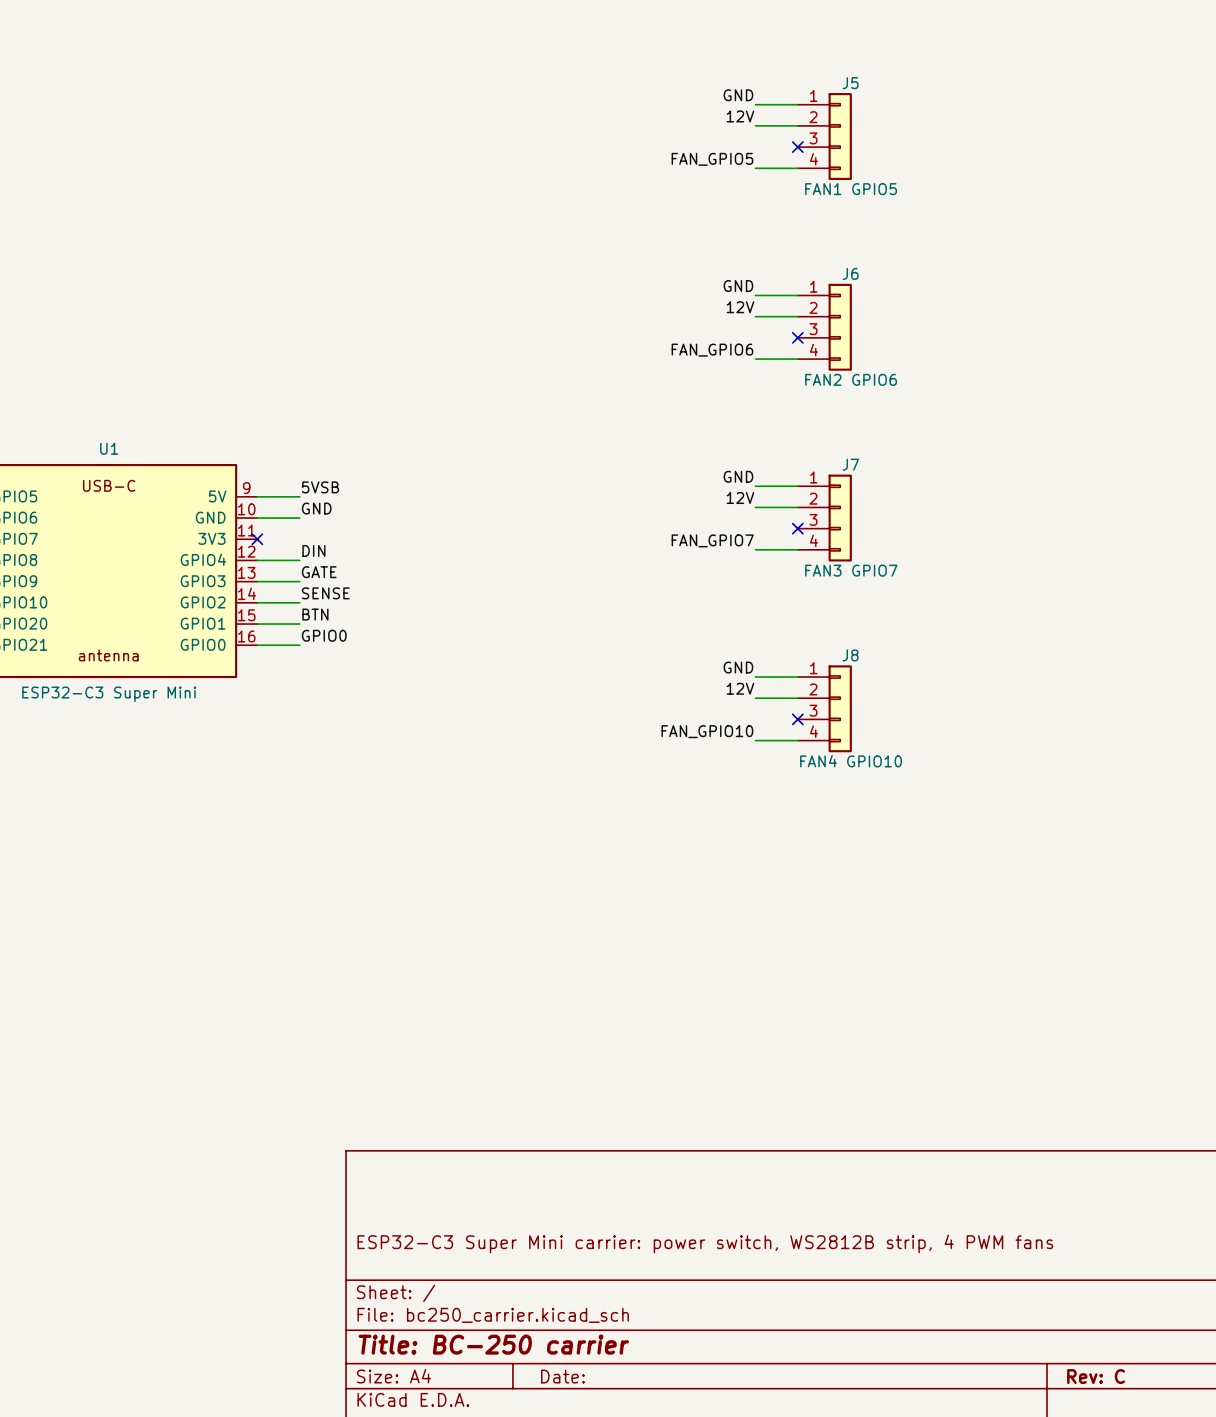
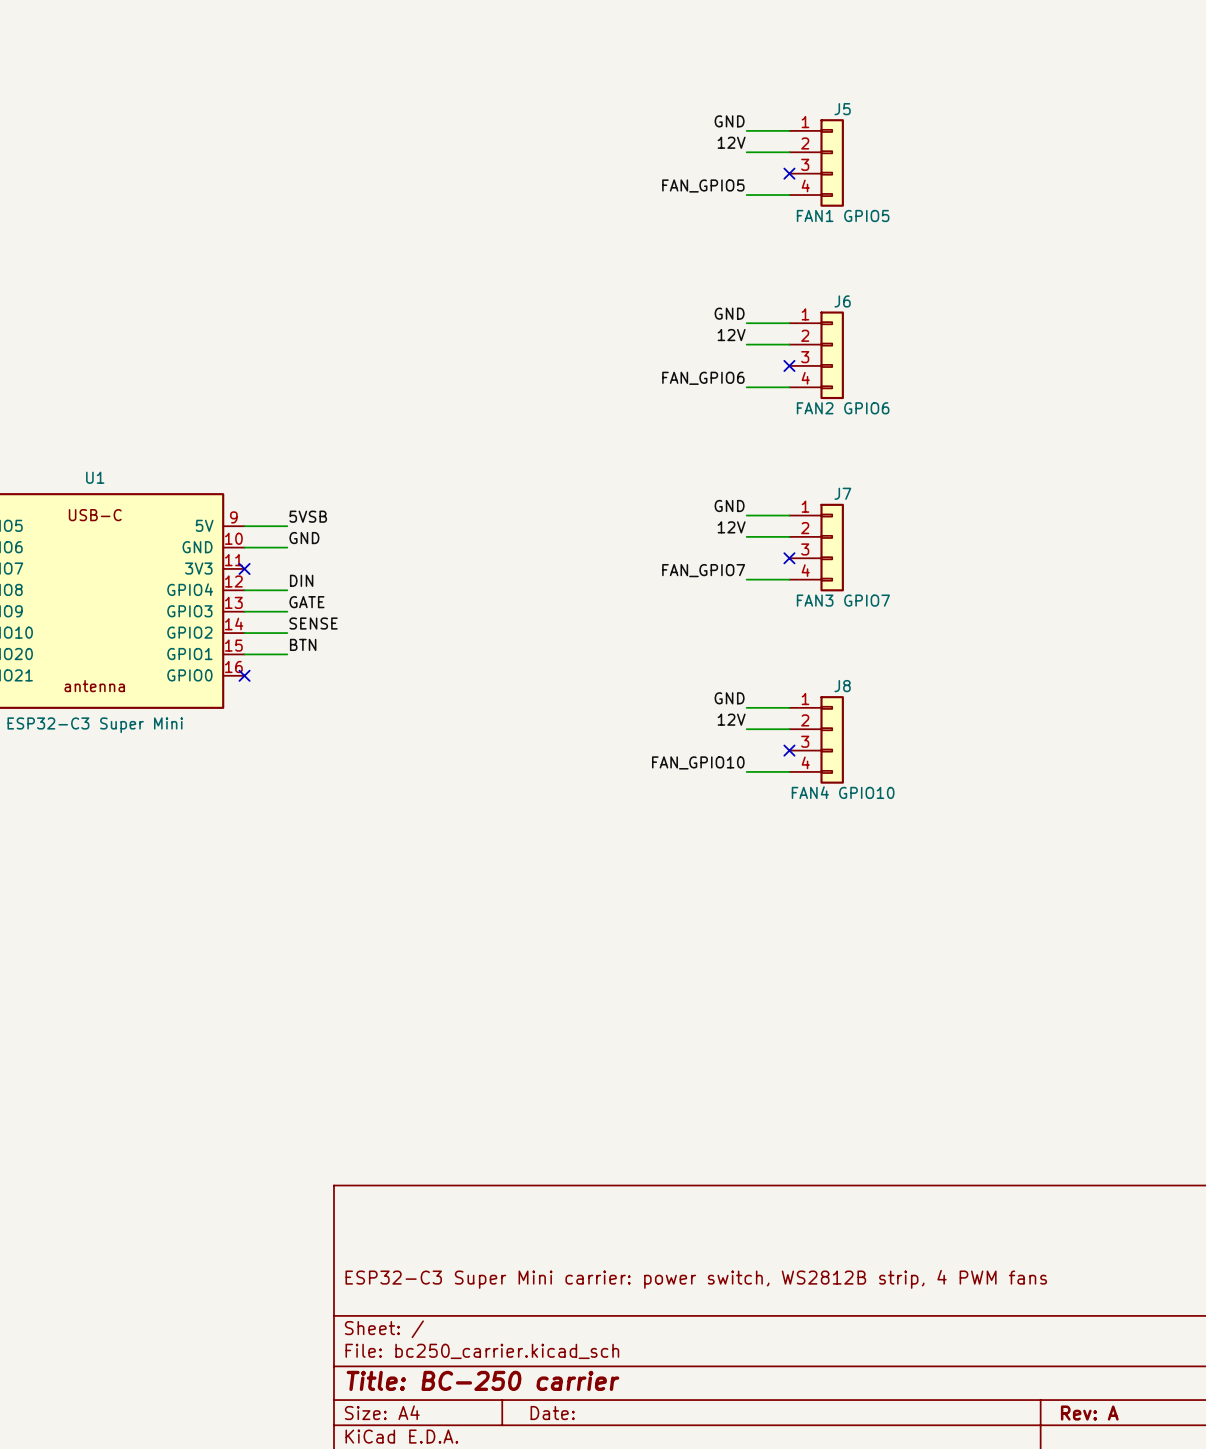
label: GPIO0 (324, 635) -> none
wire: (257, 645) (299, 645) -> none
no-connect mark: none -> (244, 675)
title block: Rev: C (1096, 1376) -> Rev: A (1089, 1413)

